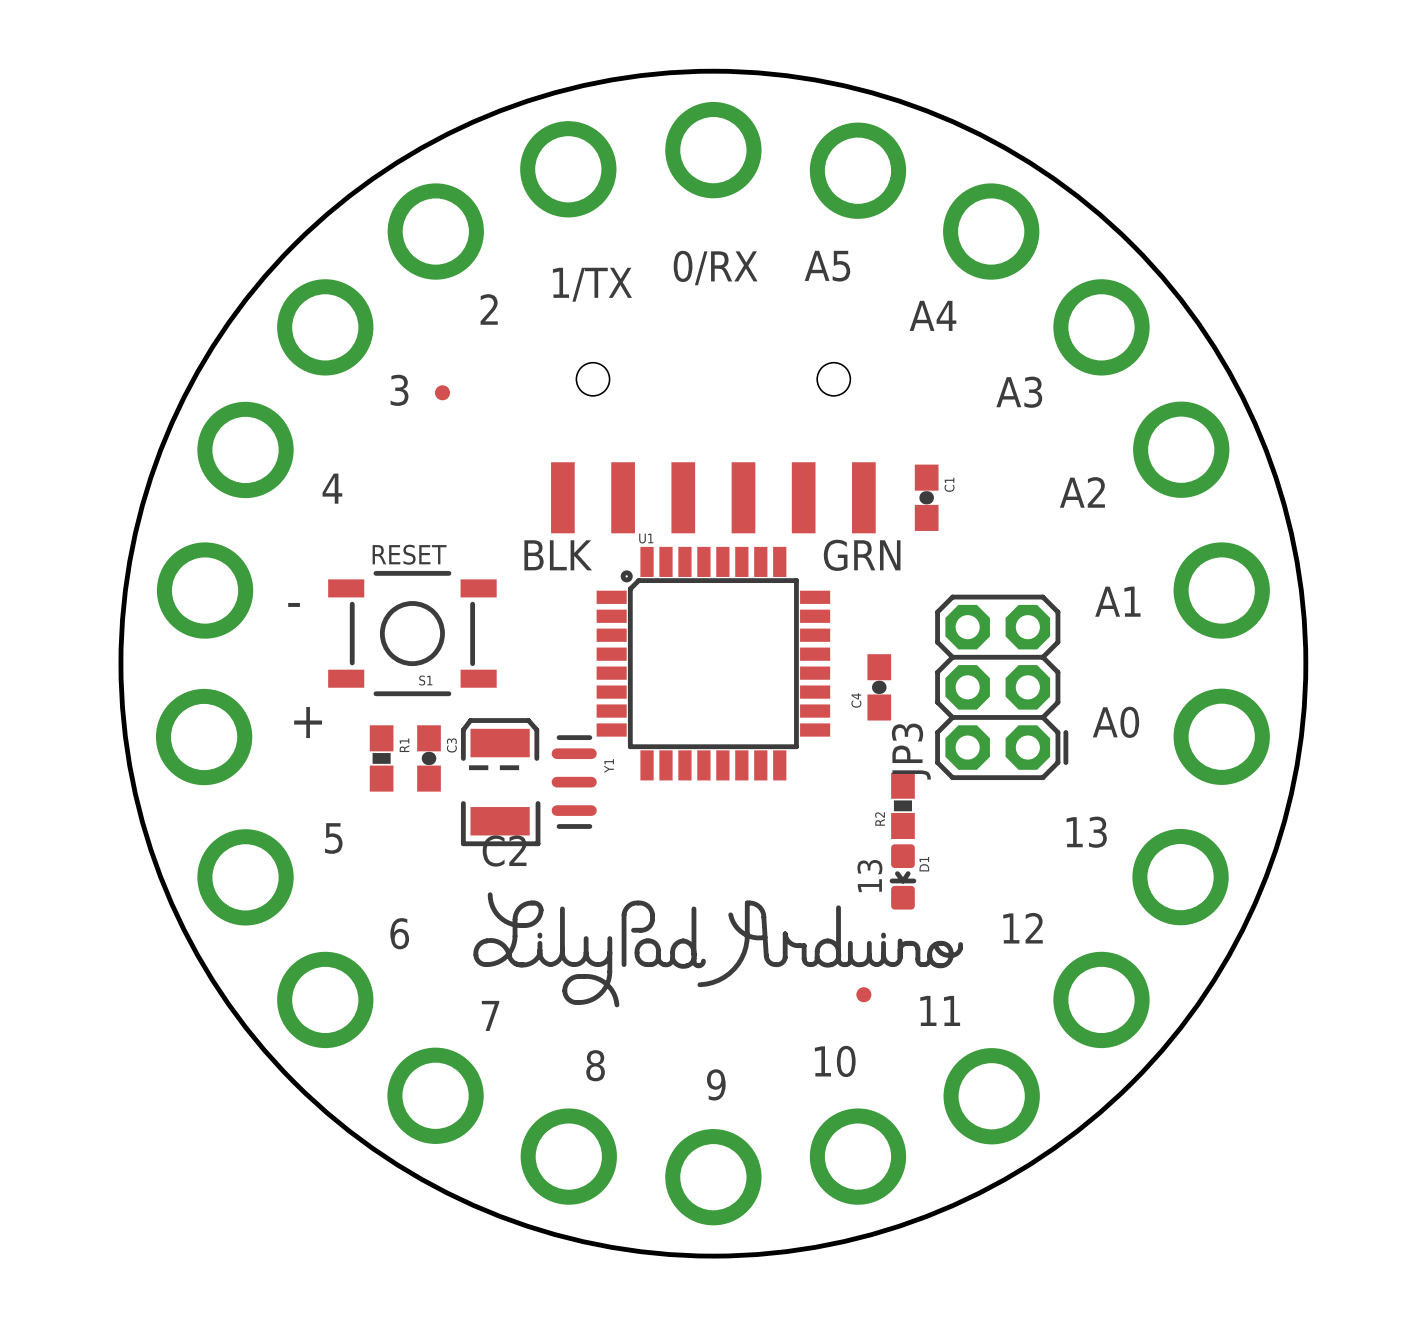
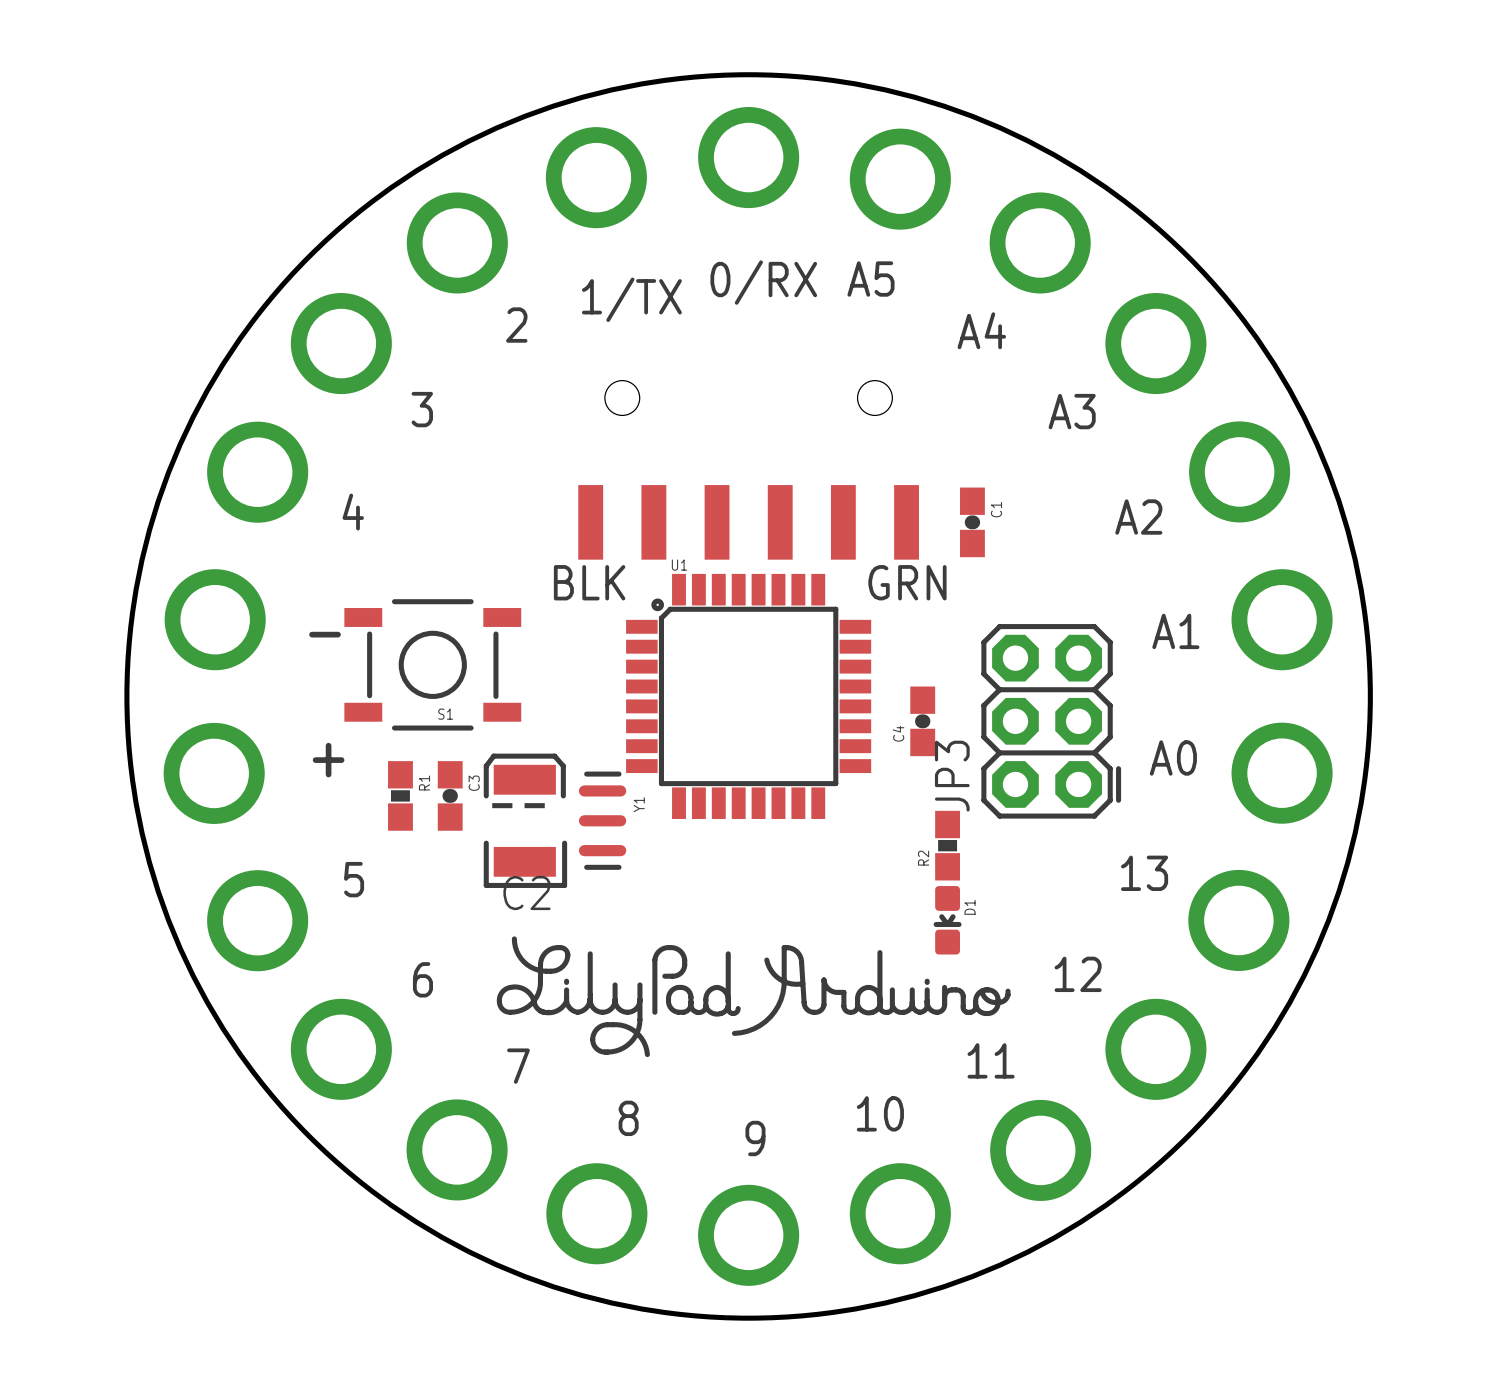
part: (442, 392) -> none
text: RESET (409, 554) -> none
text: 13 (869, 876) -> none
part: (863, 994) -> none

